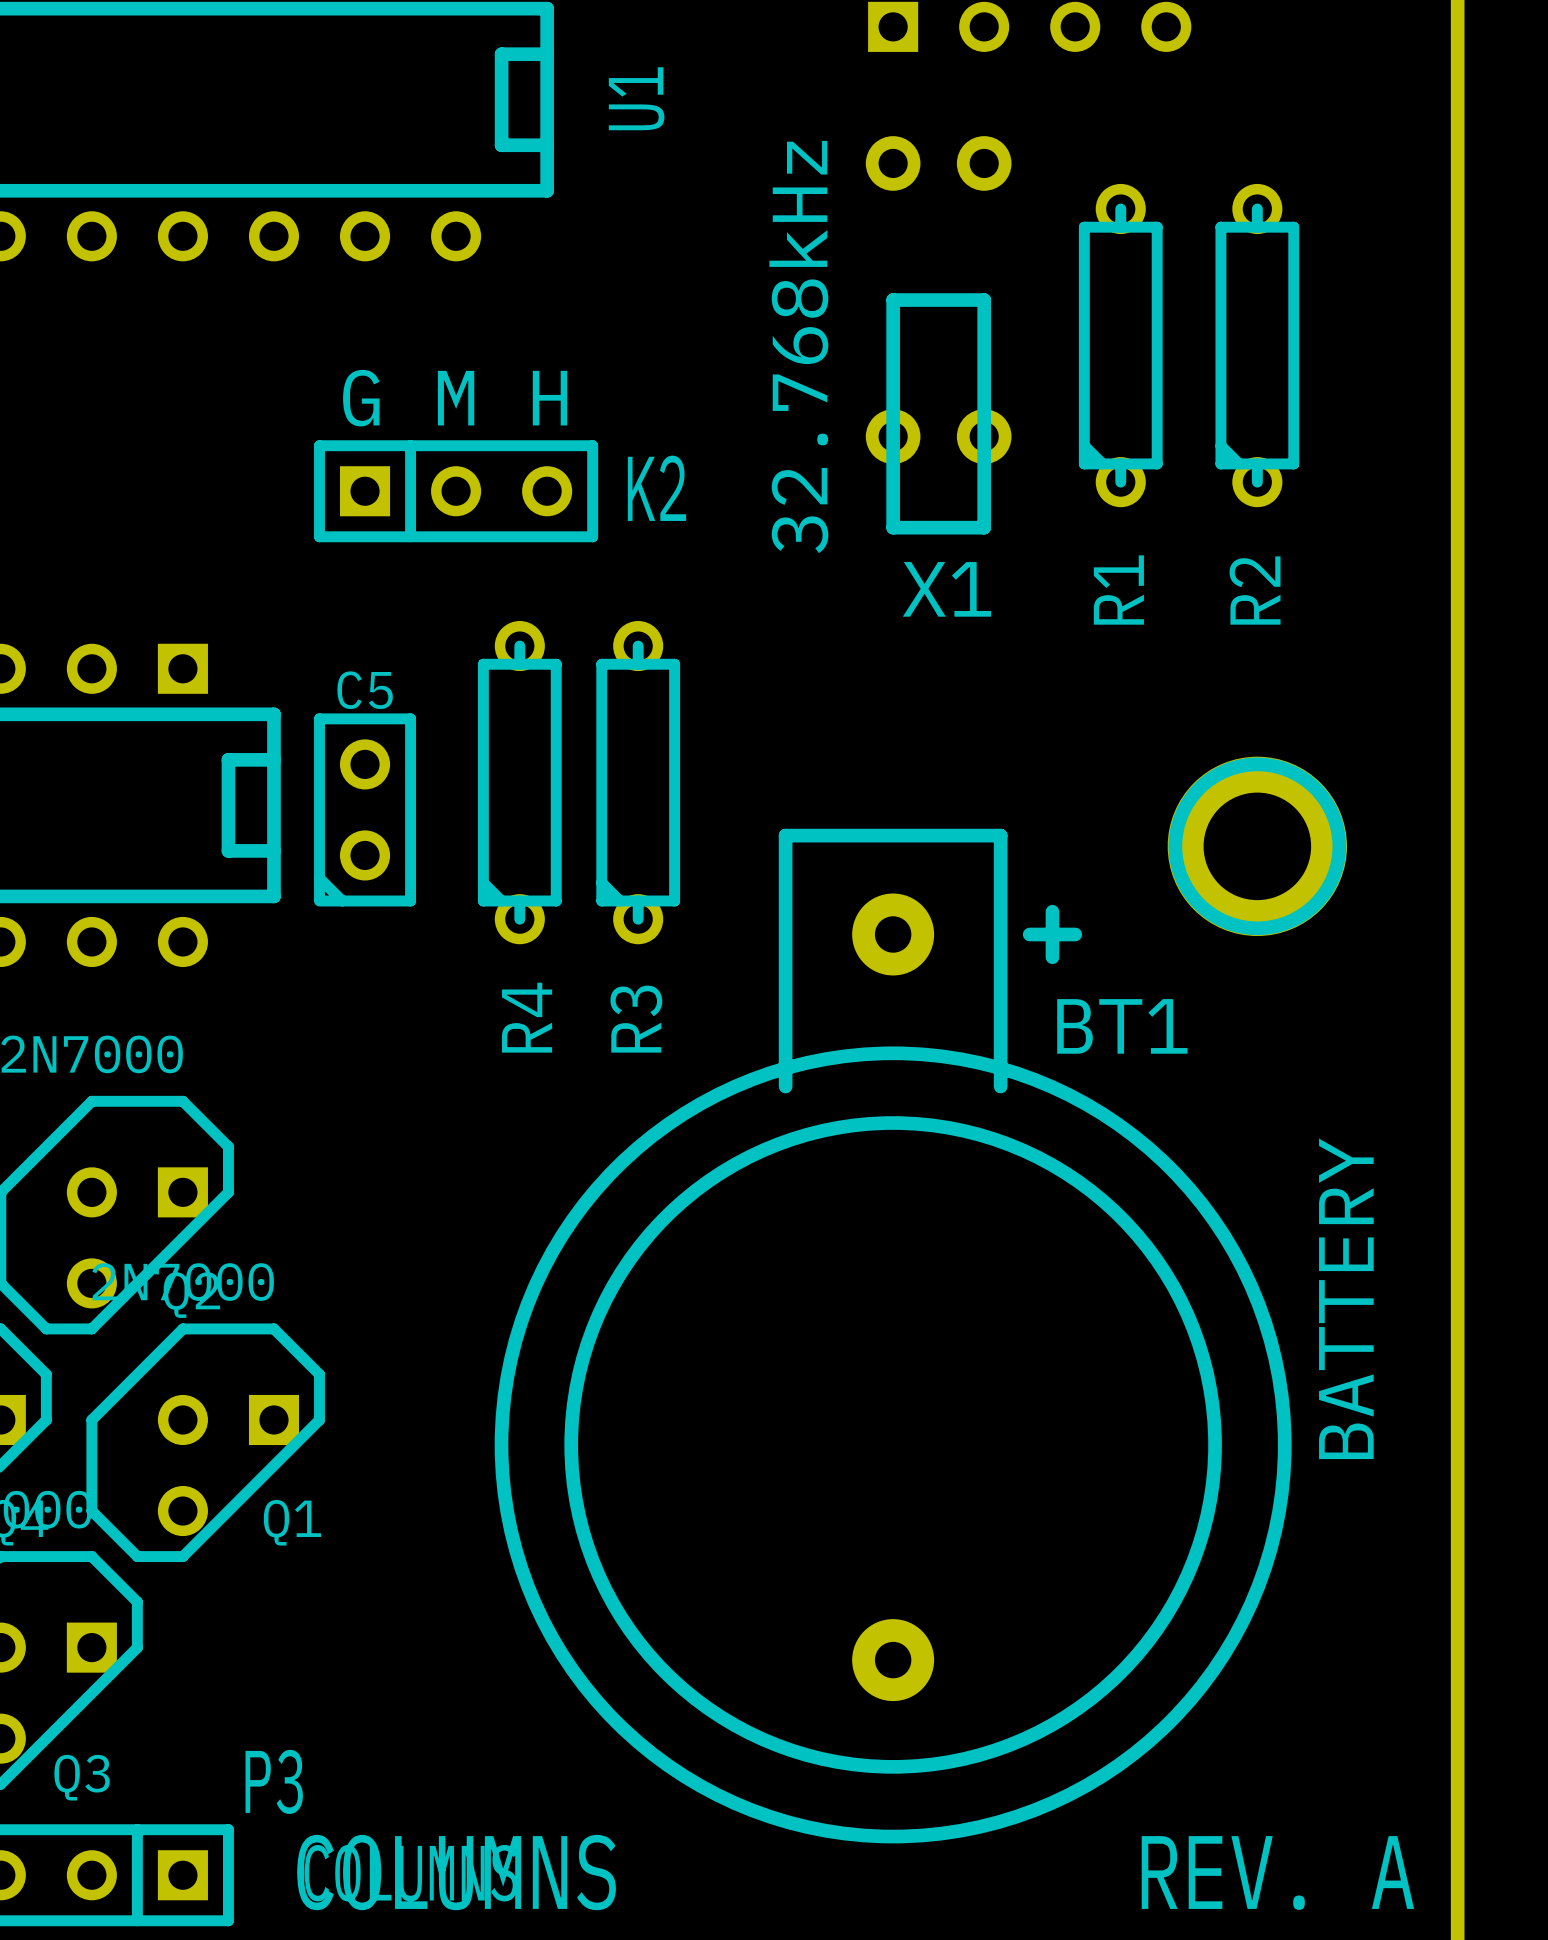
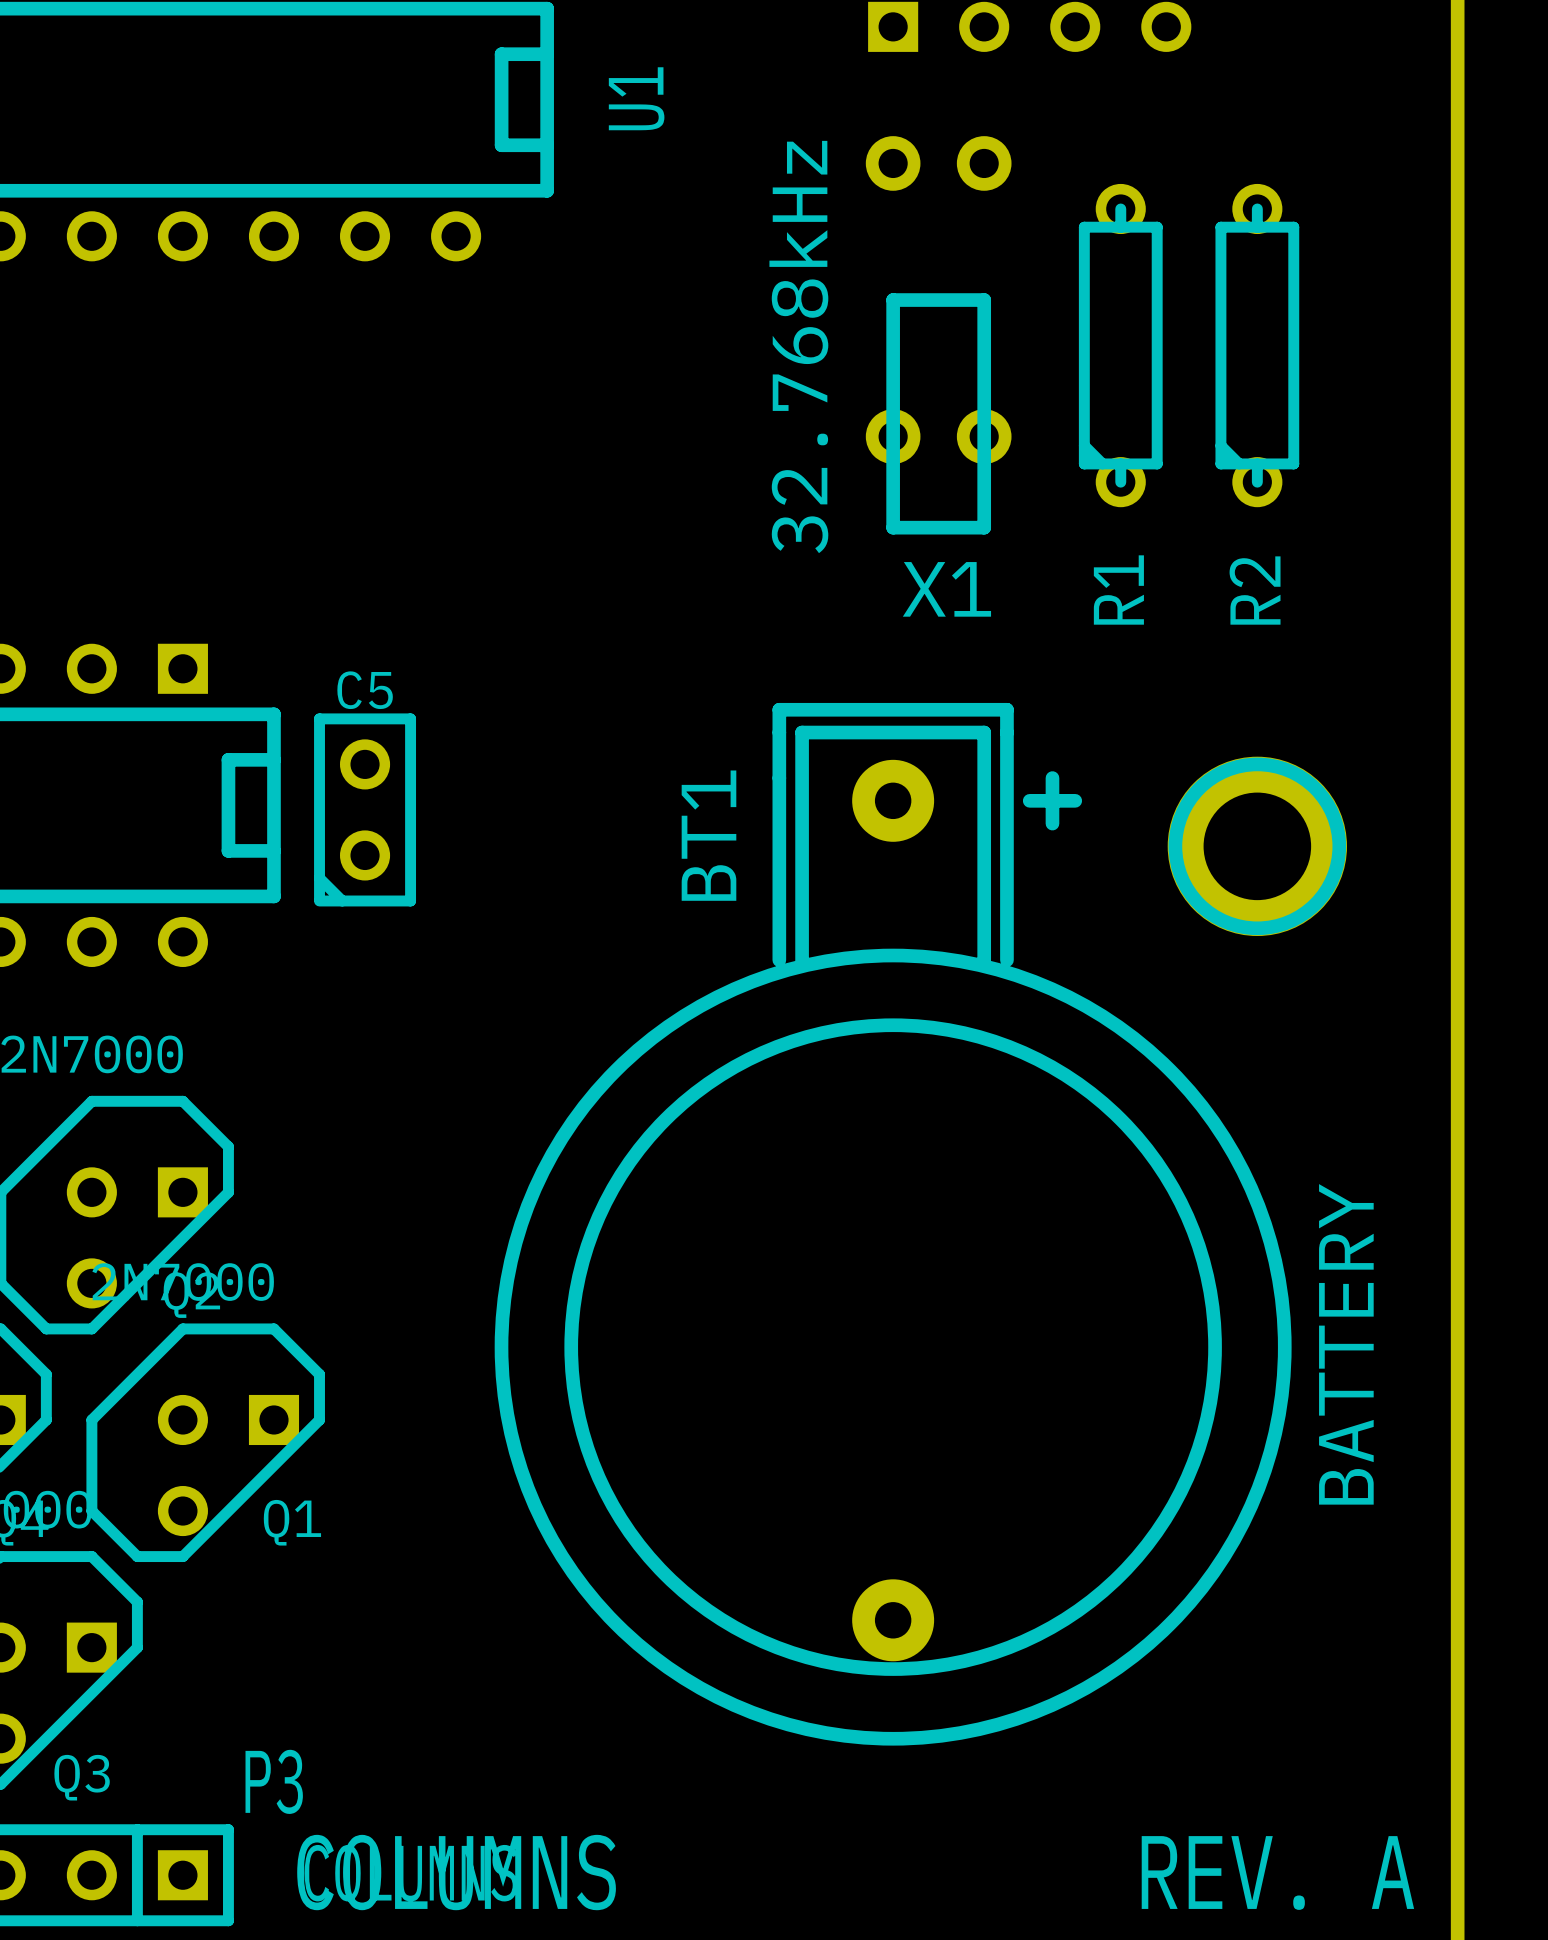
text: G M H (455, 398) -> none
K2: (456, 491) -> none
R4: (519, 782) -> none
R3: (638, 782) -> none
BT1 footprint: [494, 828, 1292, 1844] -> [494, 702, 1292, 1746]
BT1 name position: BT1 (1122, 1026) -> BT1 (708, 835)
BT1 value position: BATTERY (1346, 1298) -> BATTERY (1346, 1344)

